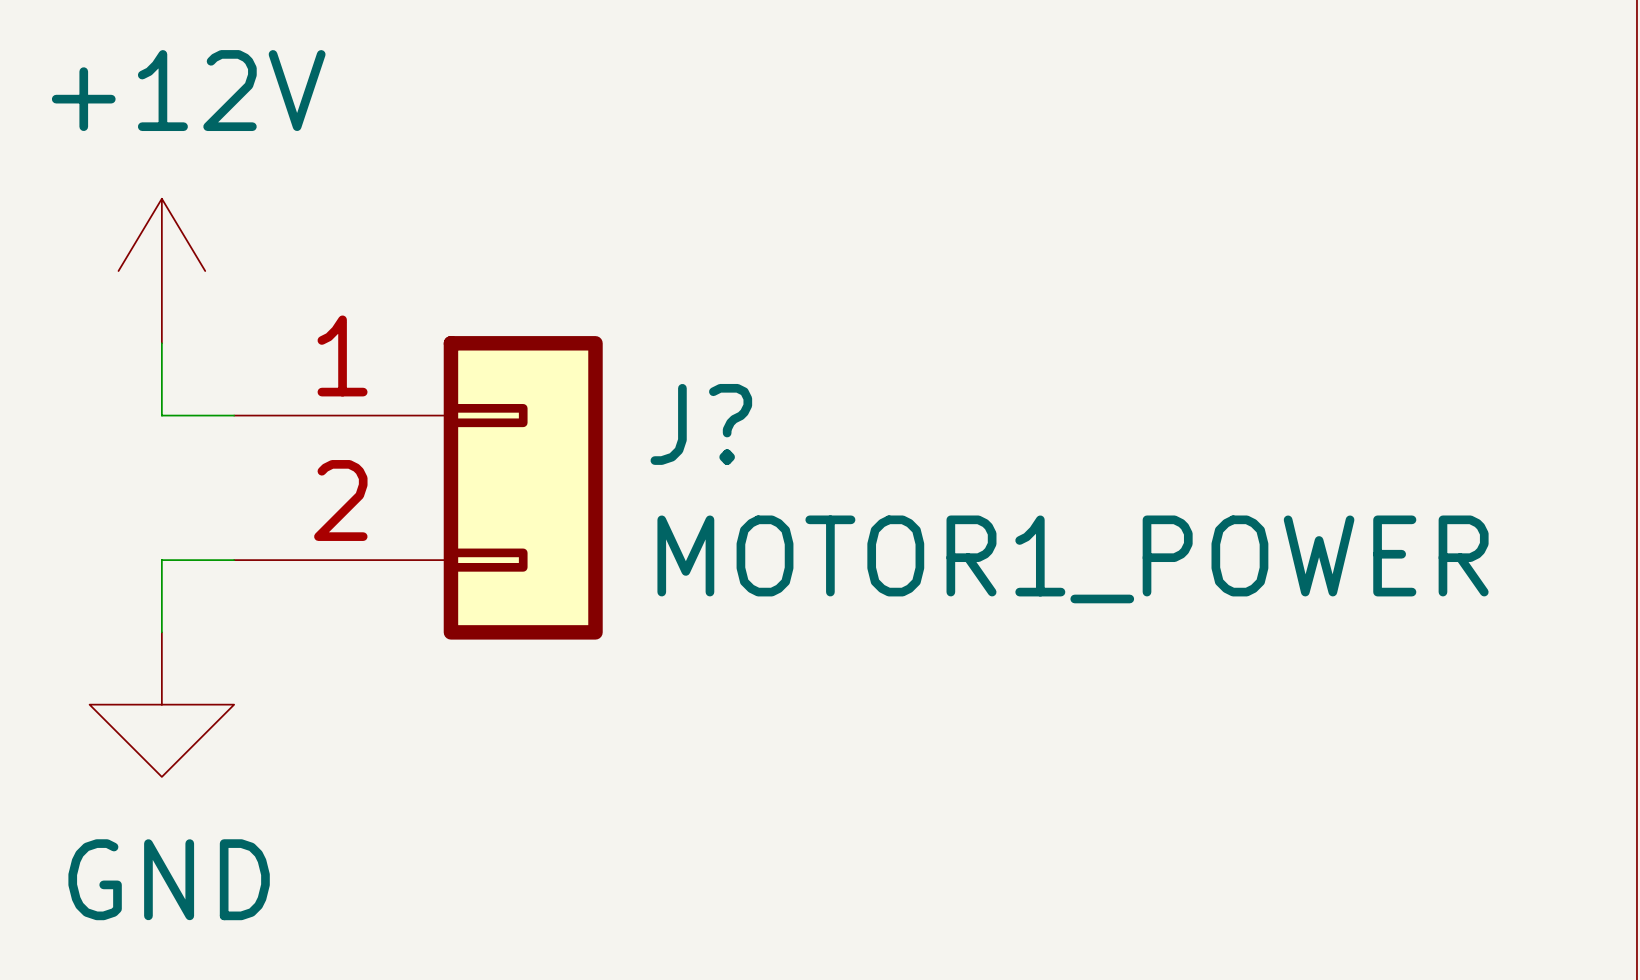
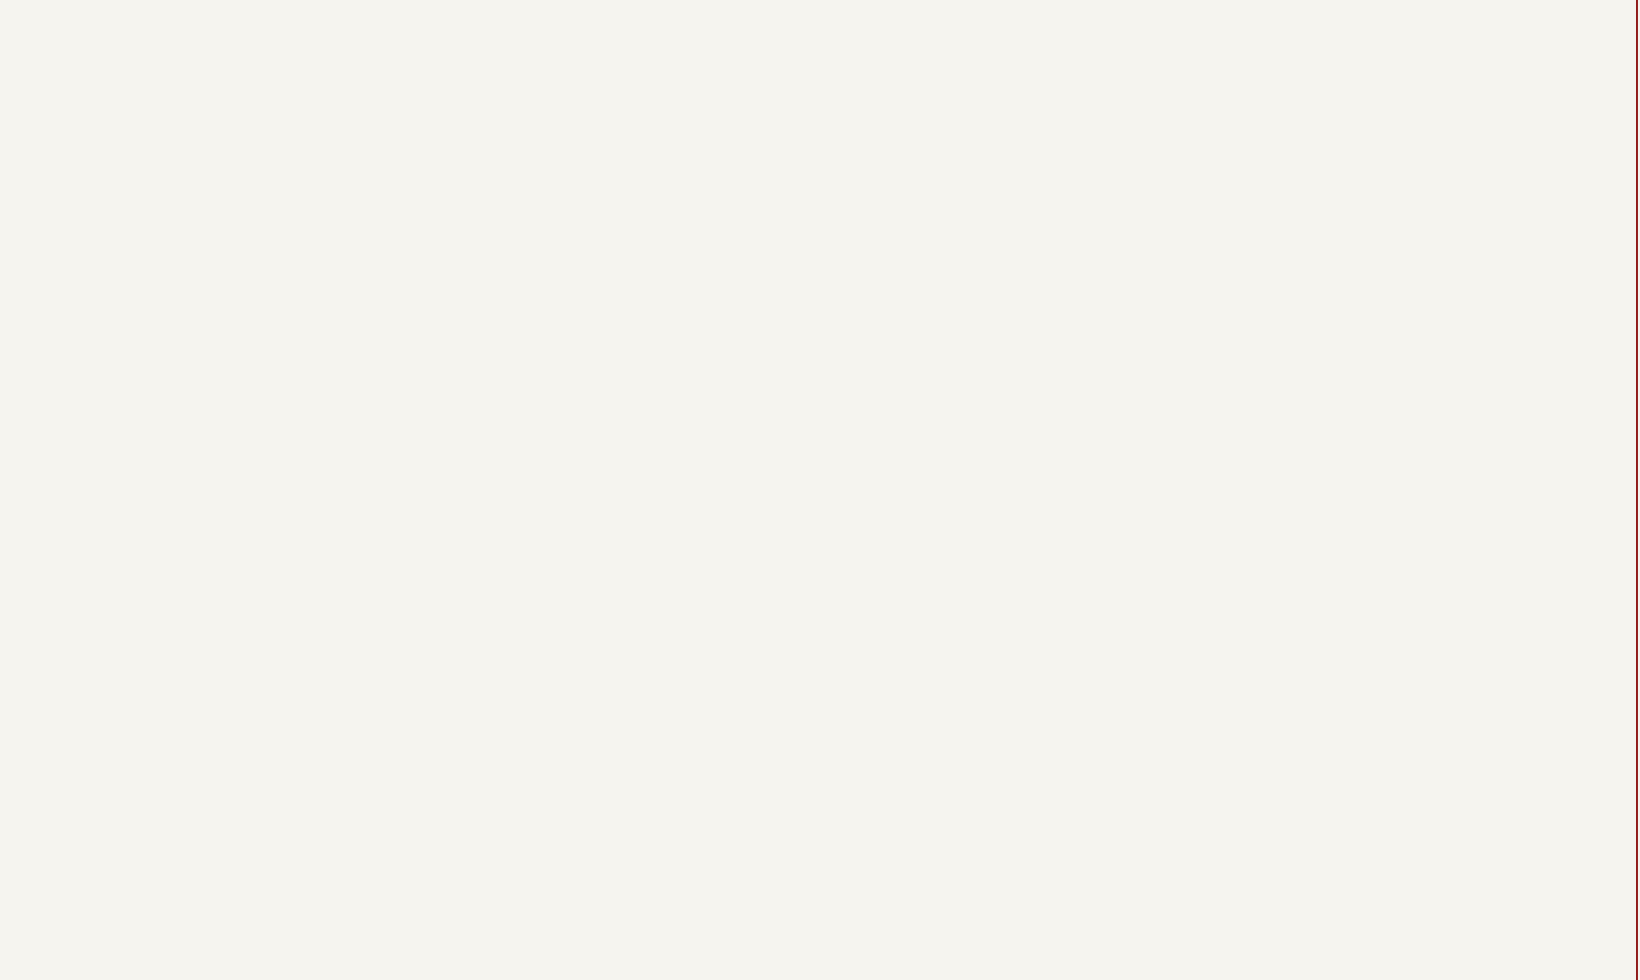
power symbol: +12V (161, 271) -> none
wire: (161, 343) (161, 415) (234, 415) -> none
J?: MOTOR1_POWER (418, 487) -> none
wire: (234, 560) (161, 560) (161, 632) -> none
power symbol: GND (161, 704) -> none

